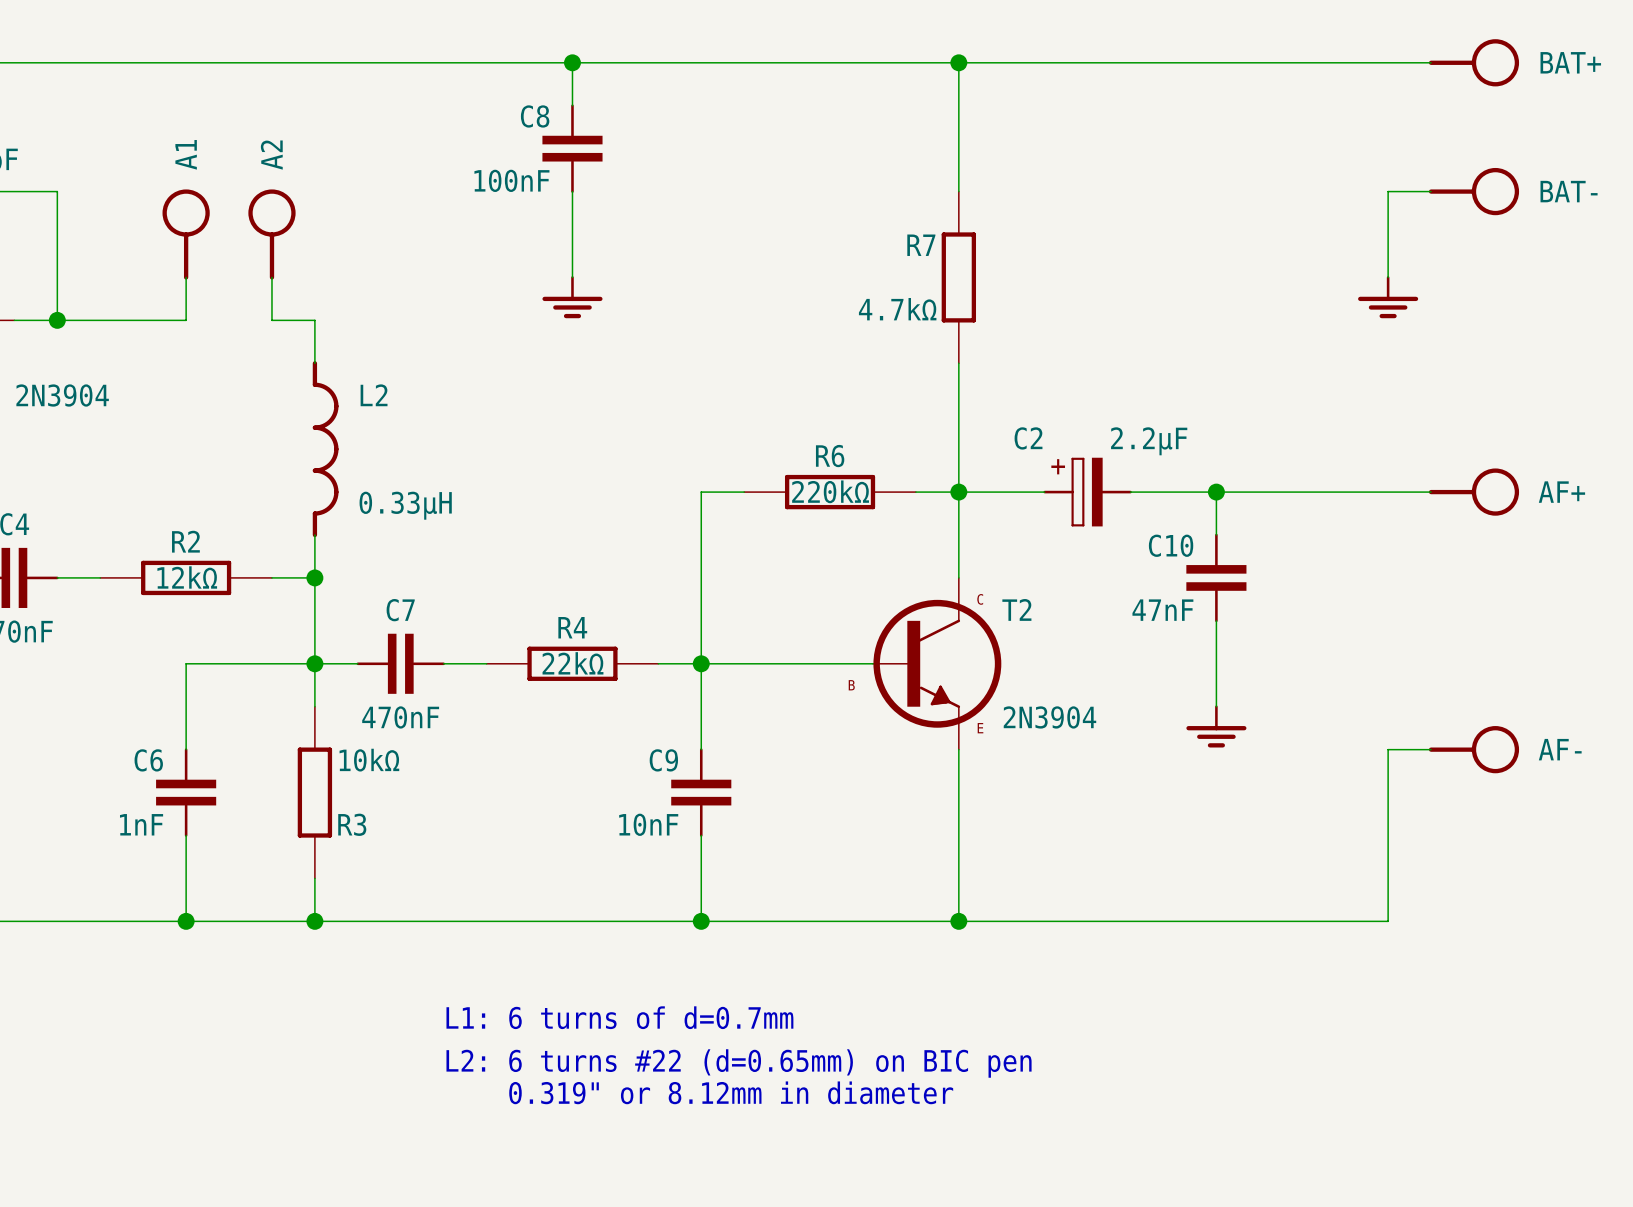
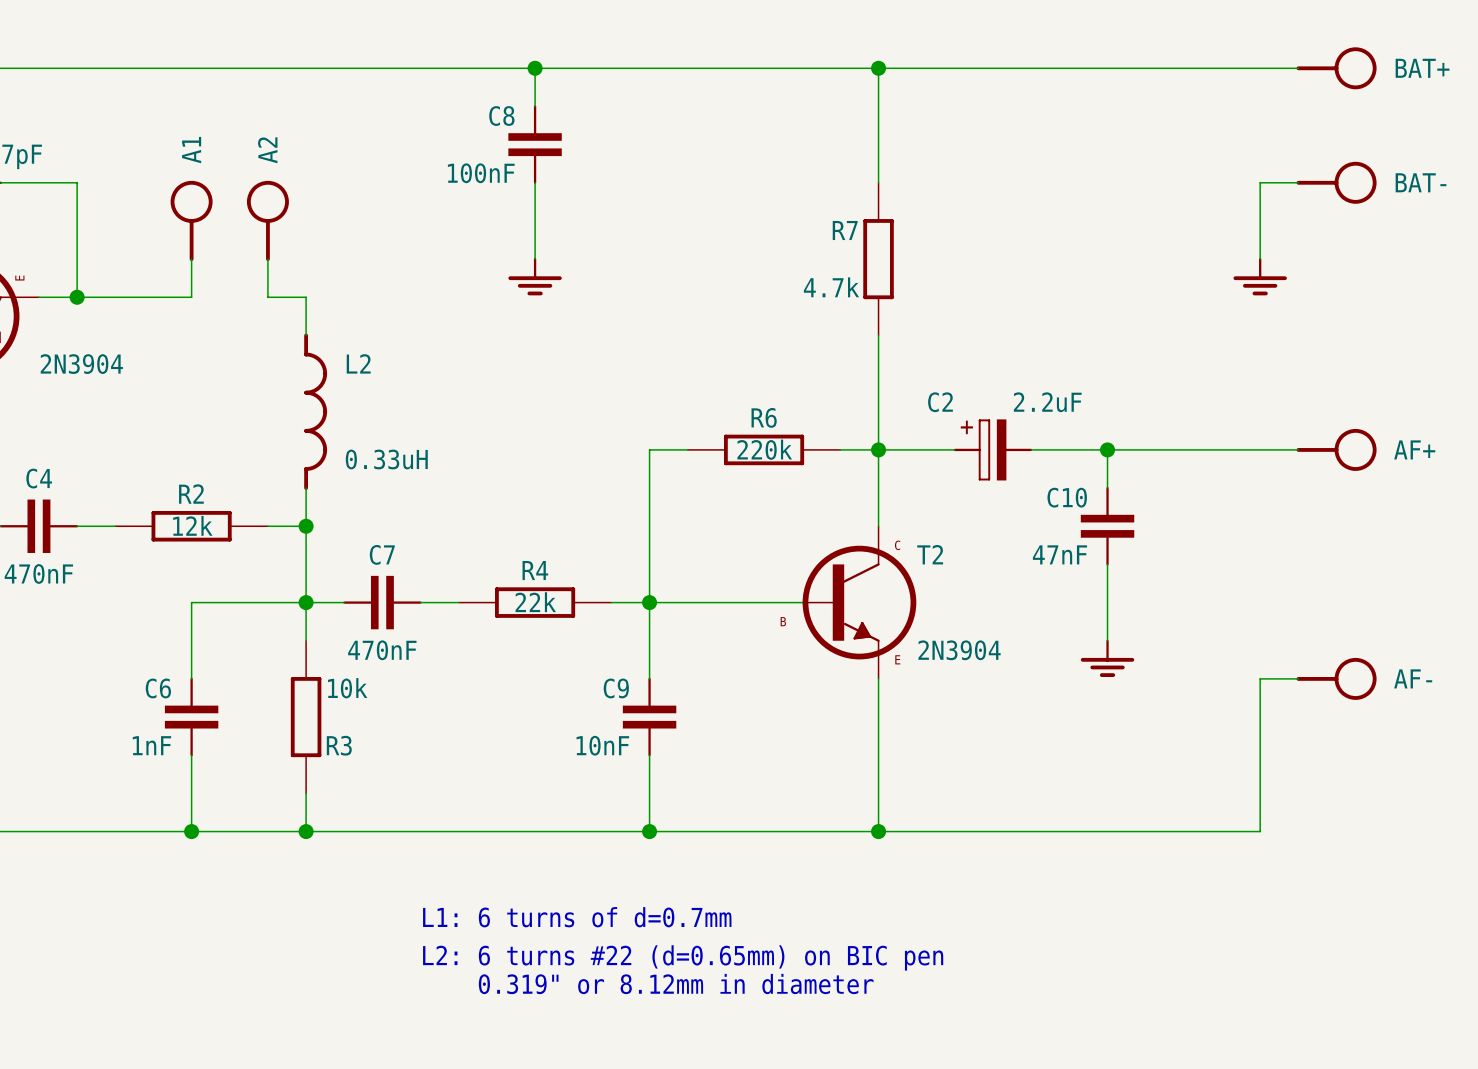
R7 value: 4.7kΩ (897, 309) -> 4.7k (831, 287)
C2 value: 2.2μF (1149, 441) -> 2.2uF (1047, 402)
R6 value: 220kΩ (830, 491) -> 220k (764, 449)
L2 value: 0.33μH (405, 505) -> 0.33uH (386, 459)
R2 value: 12kΩ (187, 577) -> 12k (192, 525)
R4 value: 22kΩ (572, 663) -> 22k (535, 602)
R3 value: 10kΩ (369, 760) -> 10k (347, 688)

